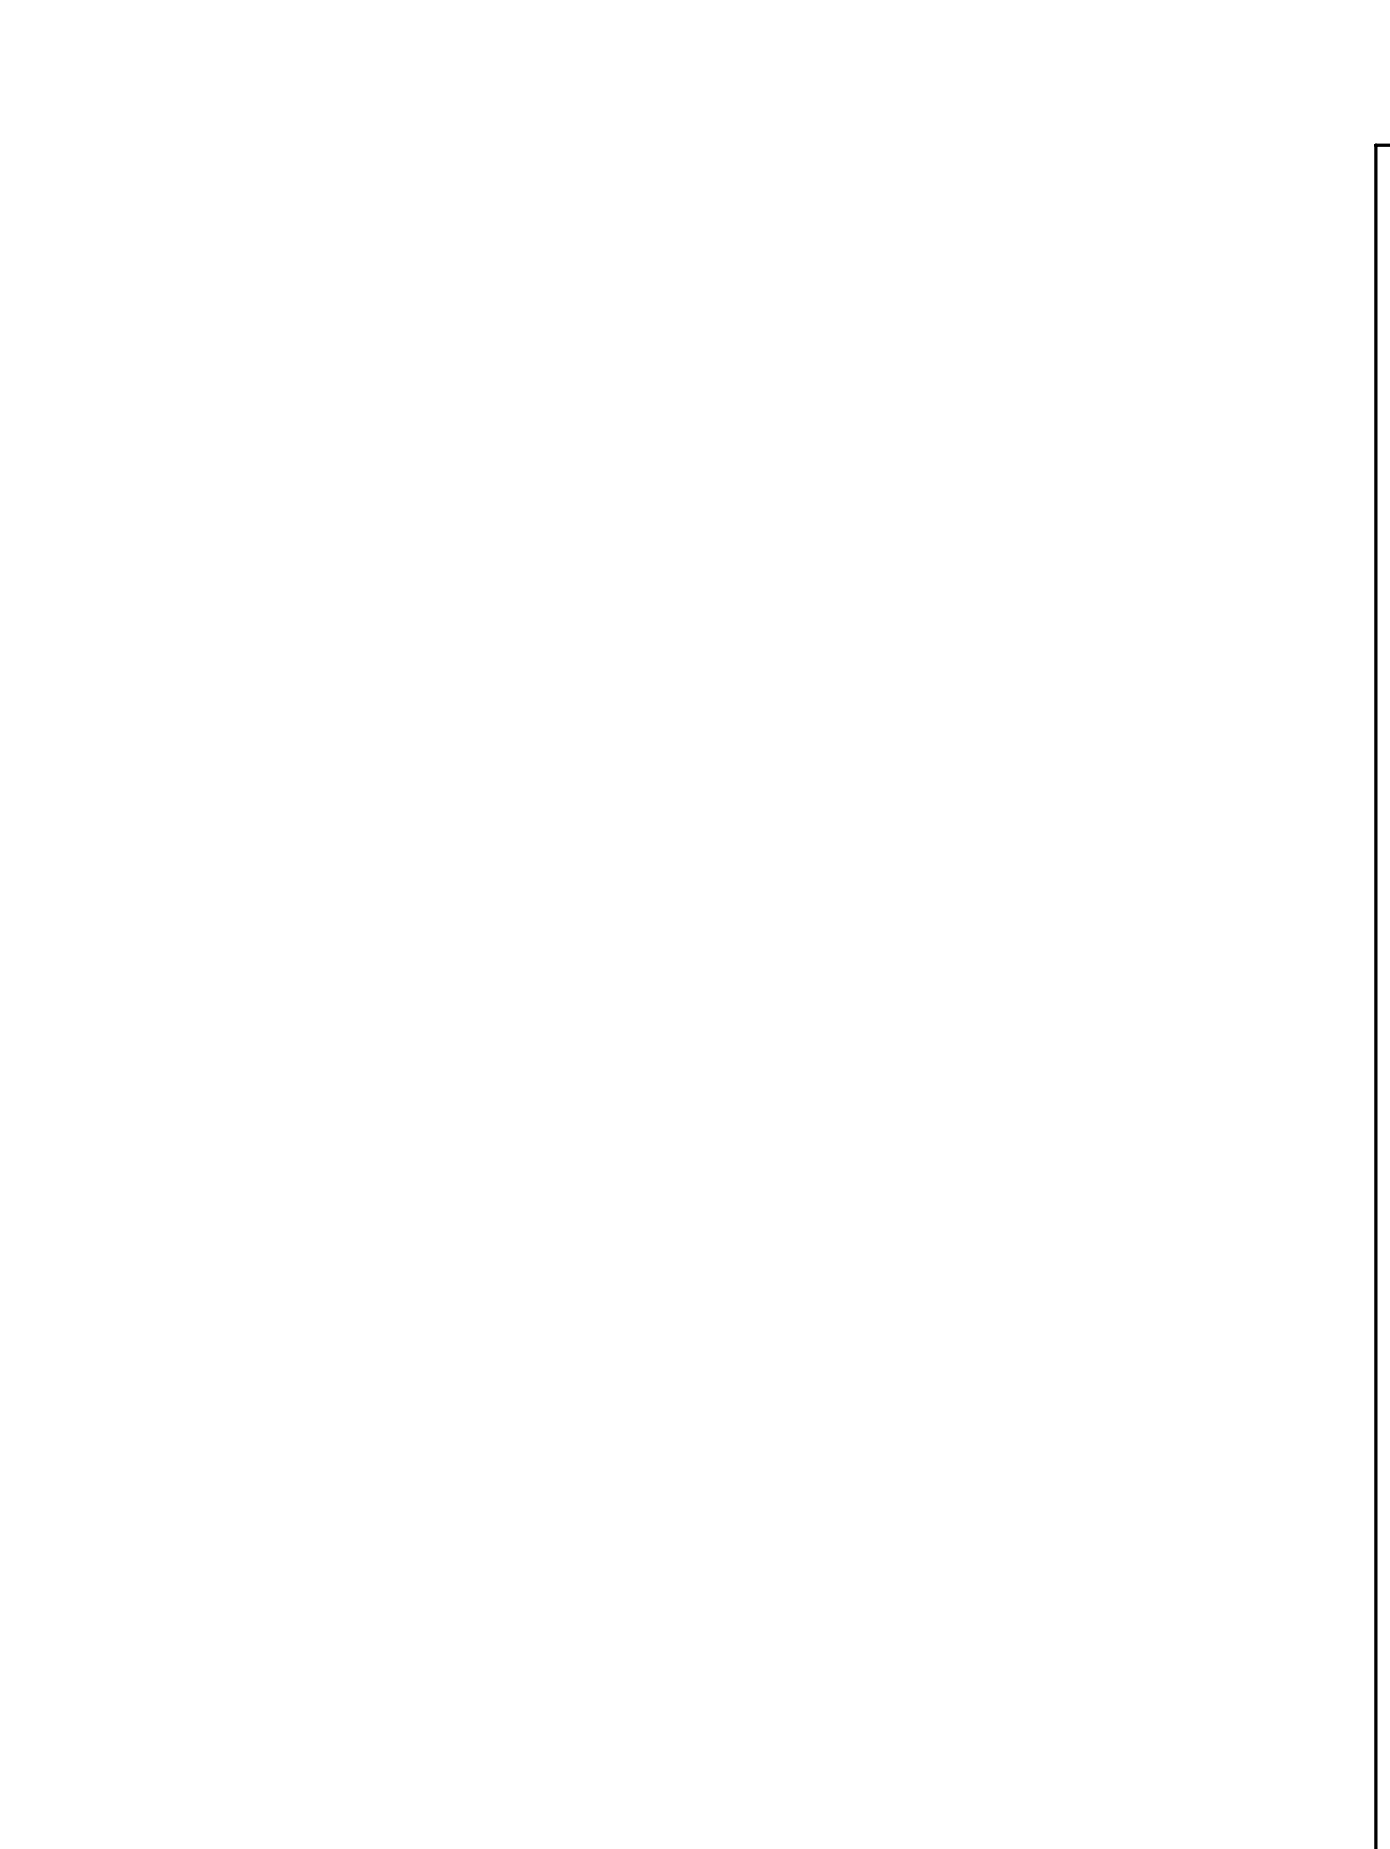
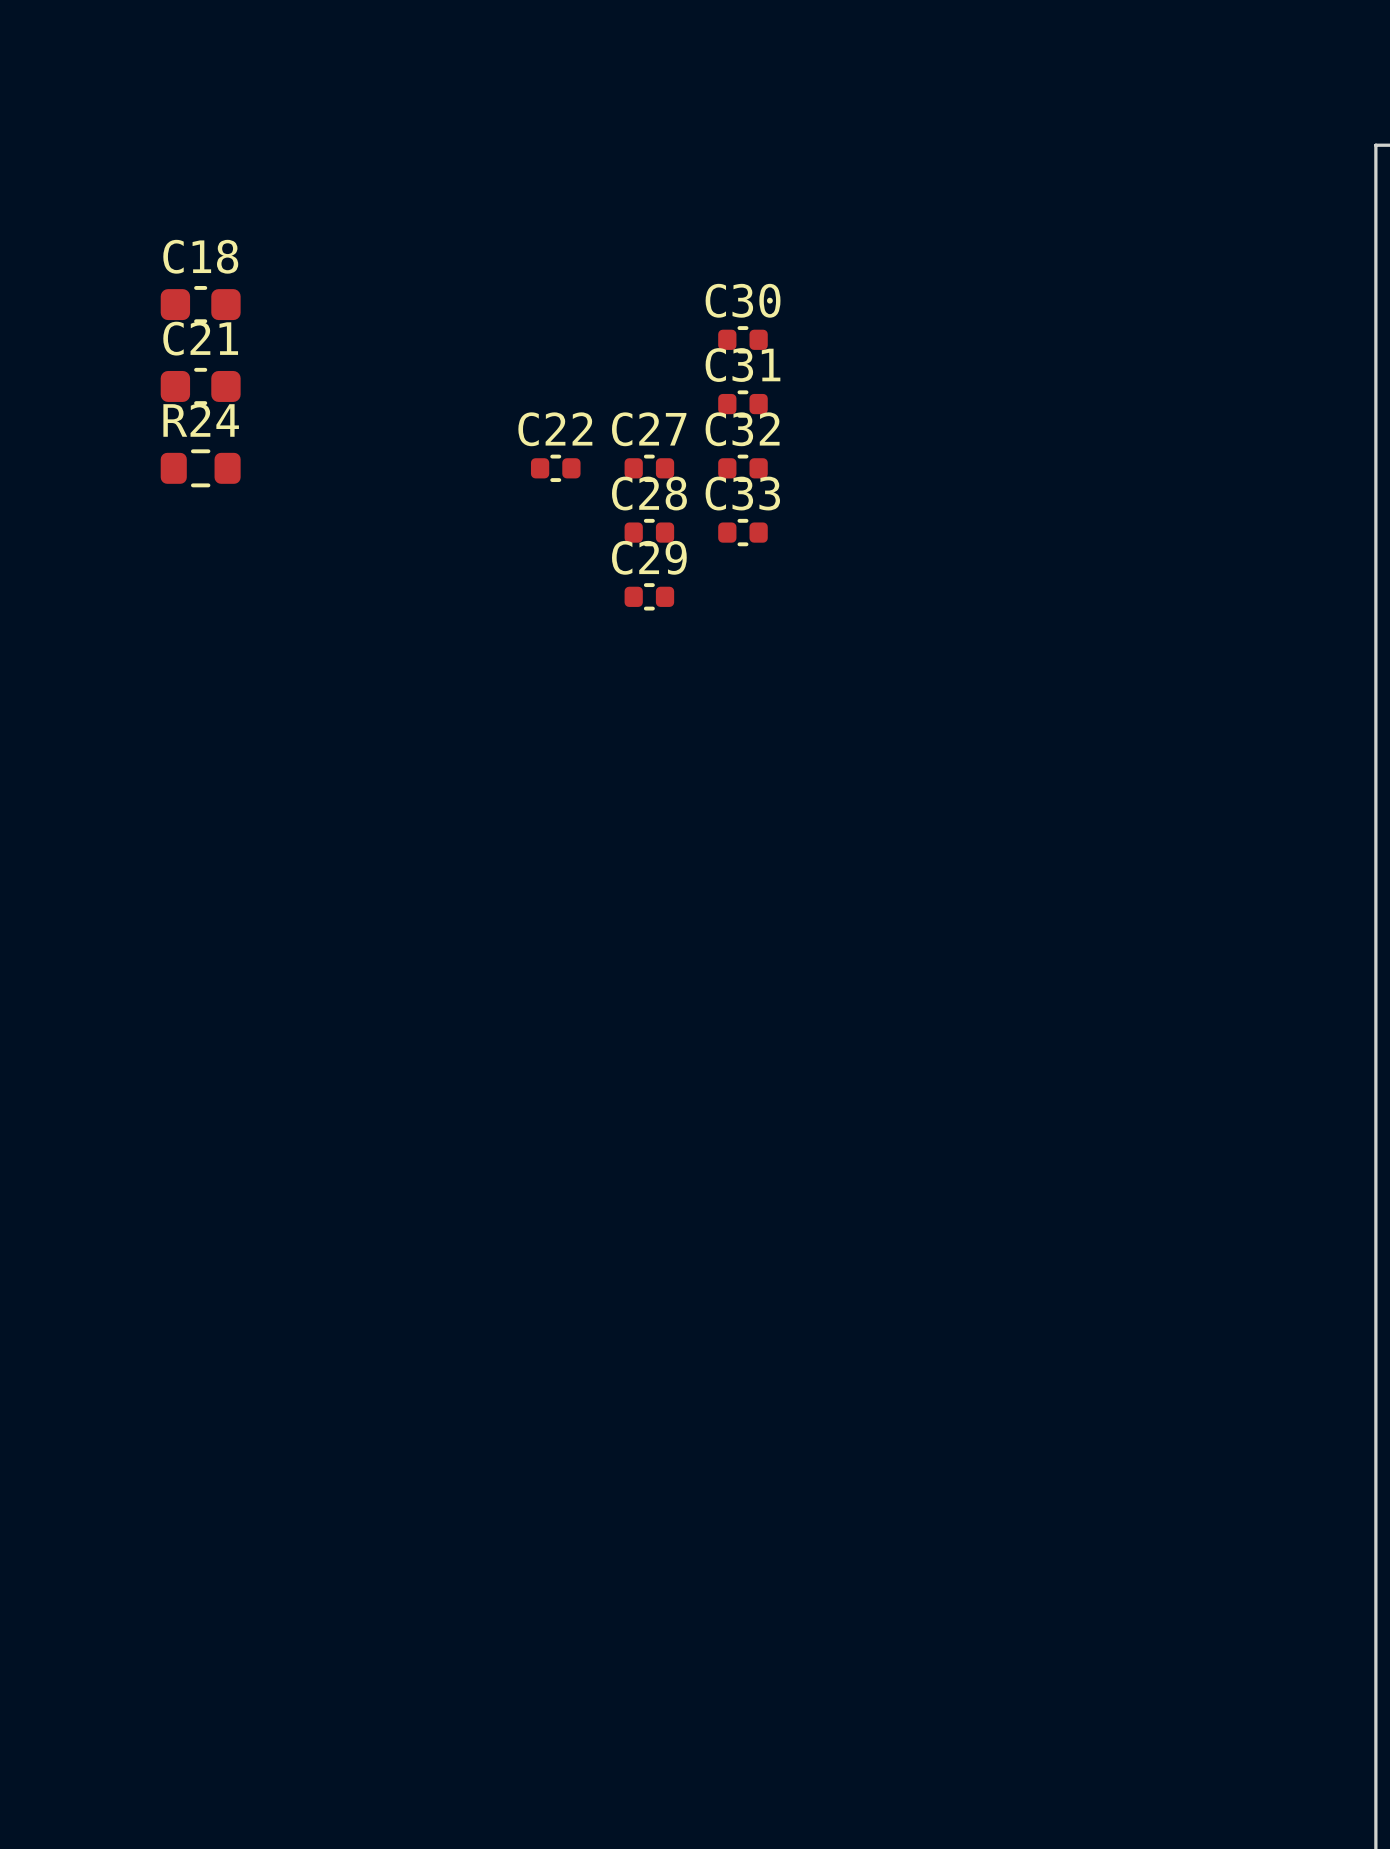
C18: none -> (200, 304)
C30: none -> (742, 339)
C21: none -> (200, 386)
C31: none -> (742, 404)
R24: none -> (200, 468)
C22: none -> (555, 468)
C27: none -> (649, 468)
C32: none -> (742, 468)
C28: none -> (649, 532)
C33: none -> (742, 532)
C29: none -> (649, 596)

